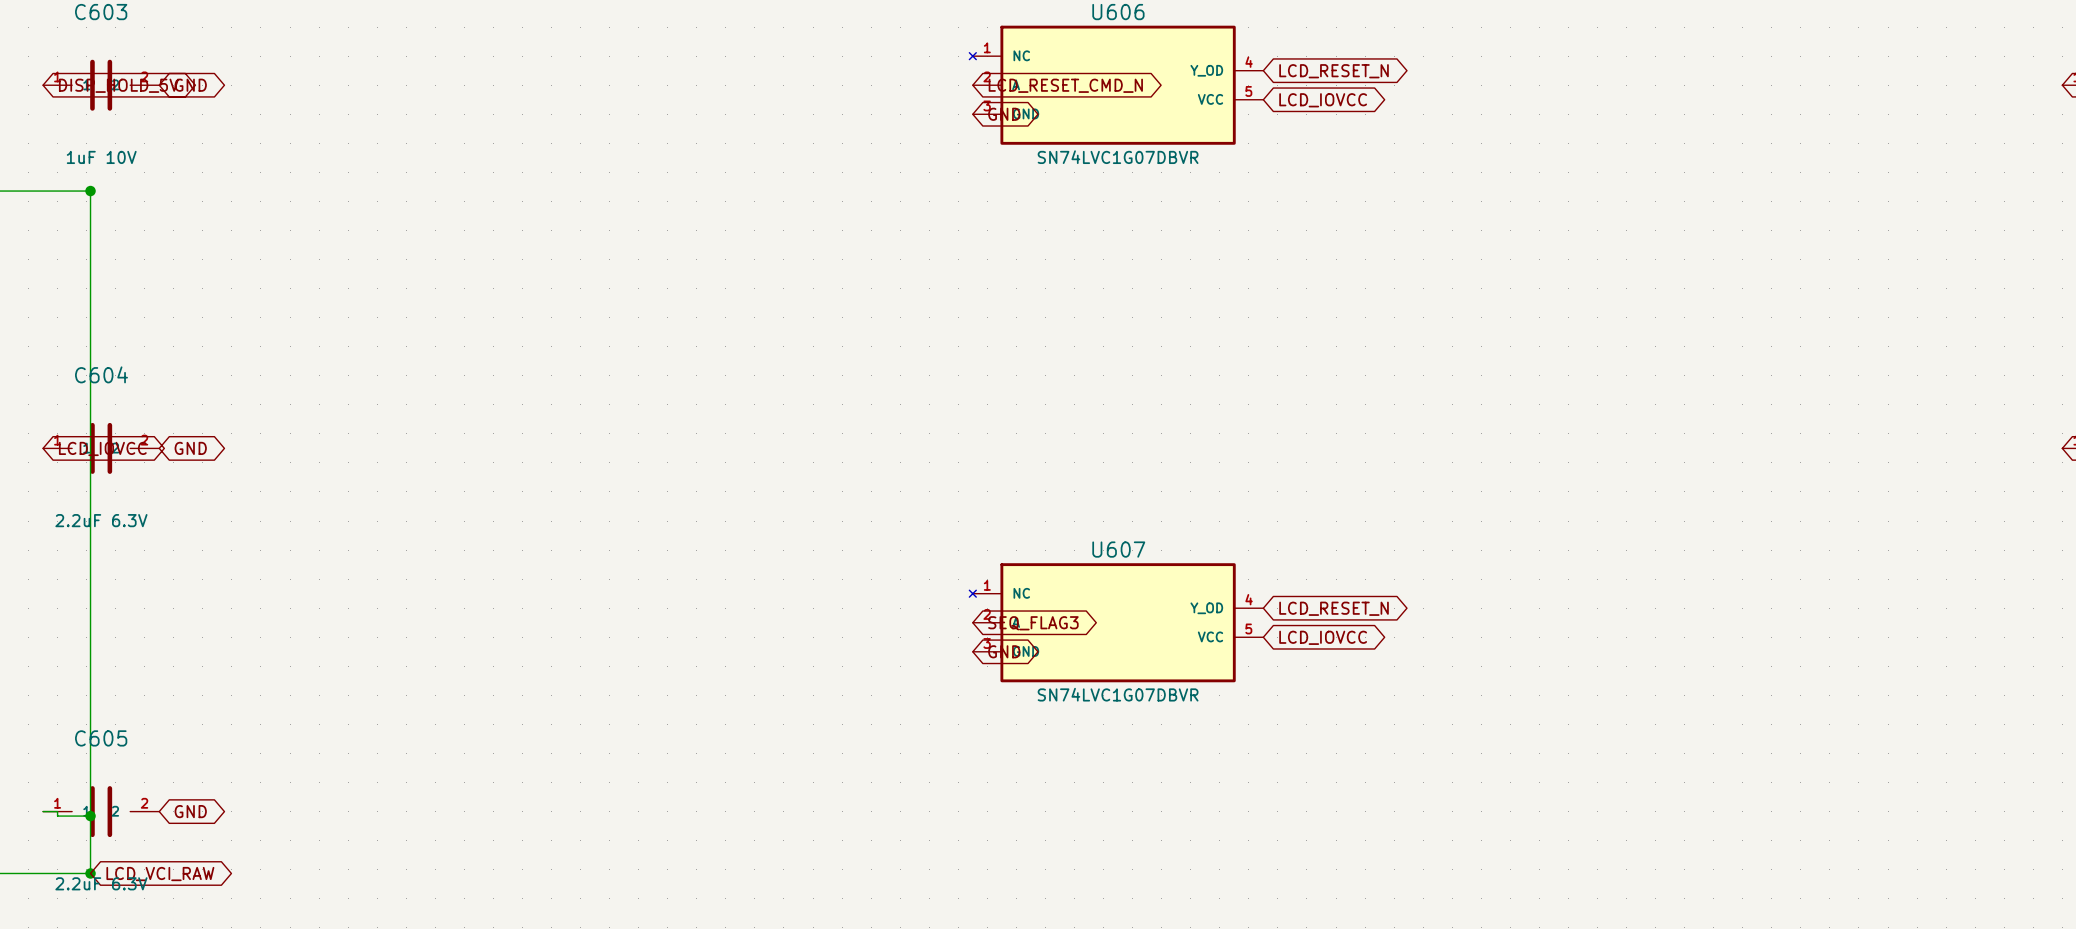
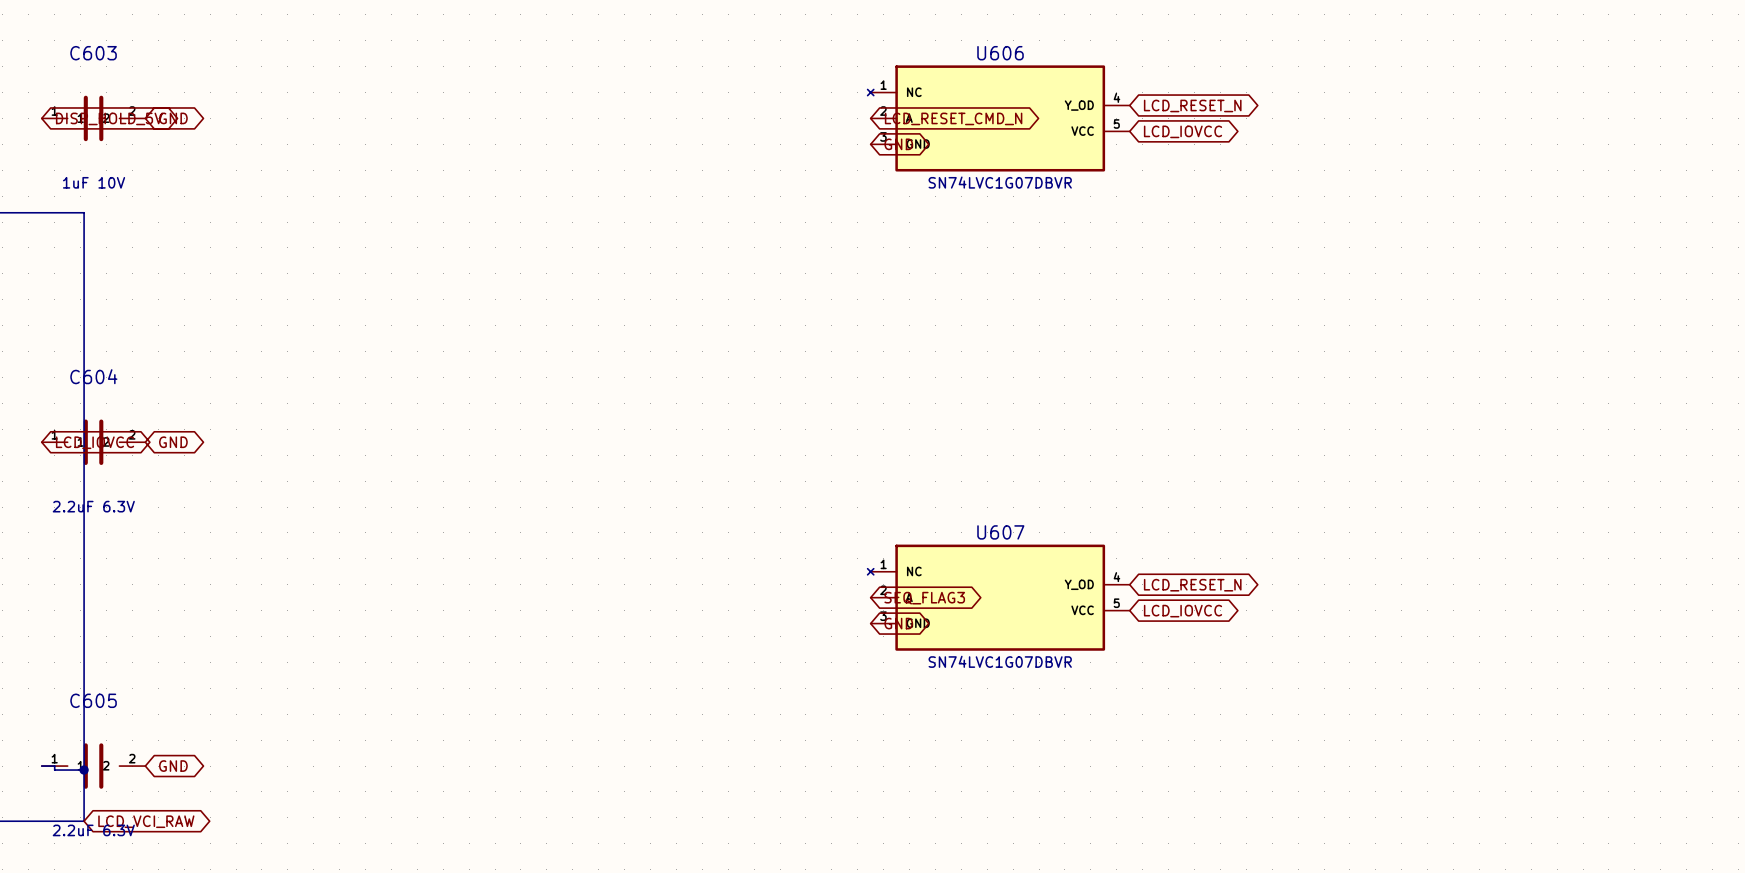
junction: (90, 191) -> none
junction: (90, 873) -> none

